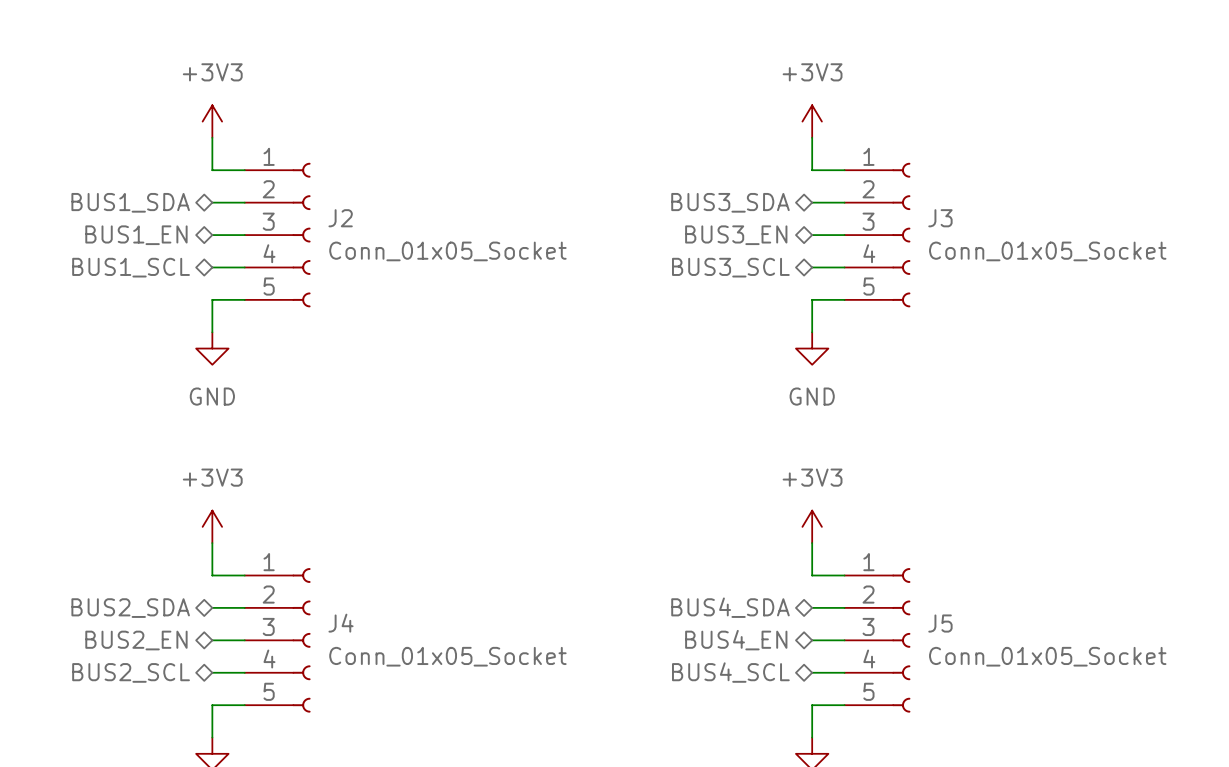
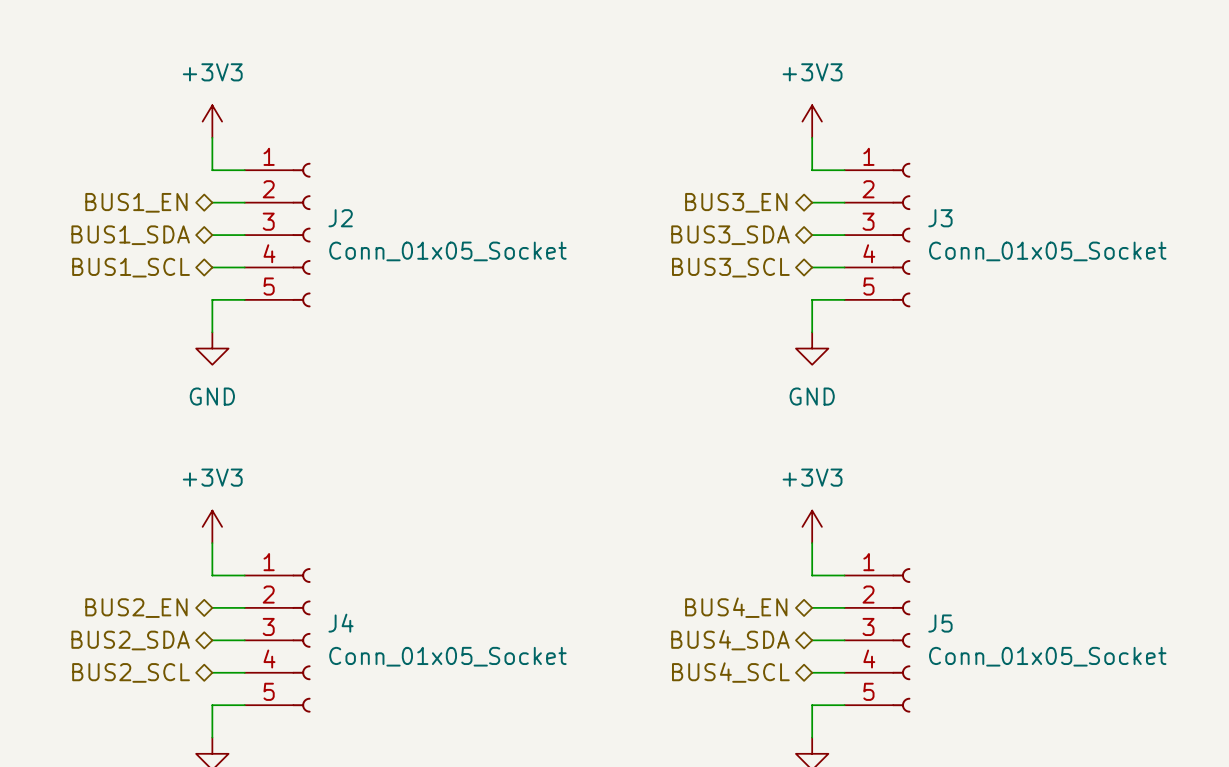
hierarchical label: BUS1_SDA (130, 202) -> BUS1_EN (136, 202)
hierarchical label: BUS3_SDA (730, 202) -> BUS3_EN (736, 202)
hierarchical label: BUS1_EN (136, 235) -> BUS1_SDA (130, 235)
hierarchical label: BUS3_EN (736, 235) -> BUS3_SDA (730, 235)
hierarchical label: BUS4_SDA (730, 607) -> BUS4_EN (736, 607)
hierarchical label: BUS2_SDA (130, 608) -> BUS2_EN (136, 608)
hierarchical label: BUS2_EN (136, 640) -> BUS2_SDA (130, 640)
hierarchical label: BUS4_EN (736, 640) -> BUS4_SDA (730, 640)

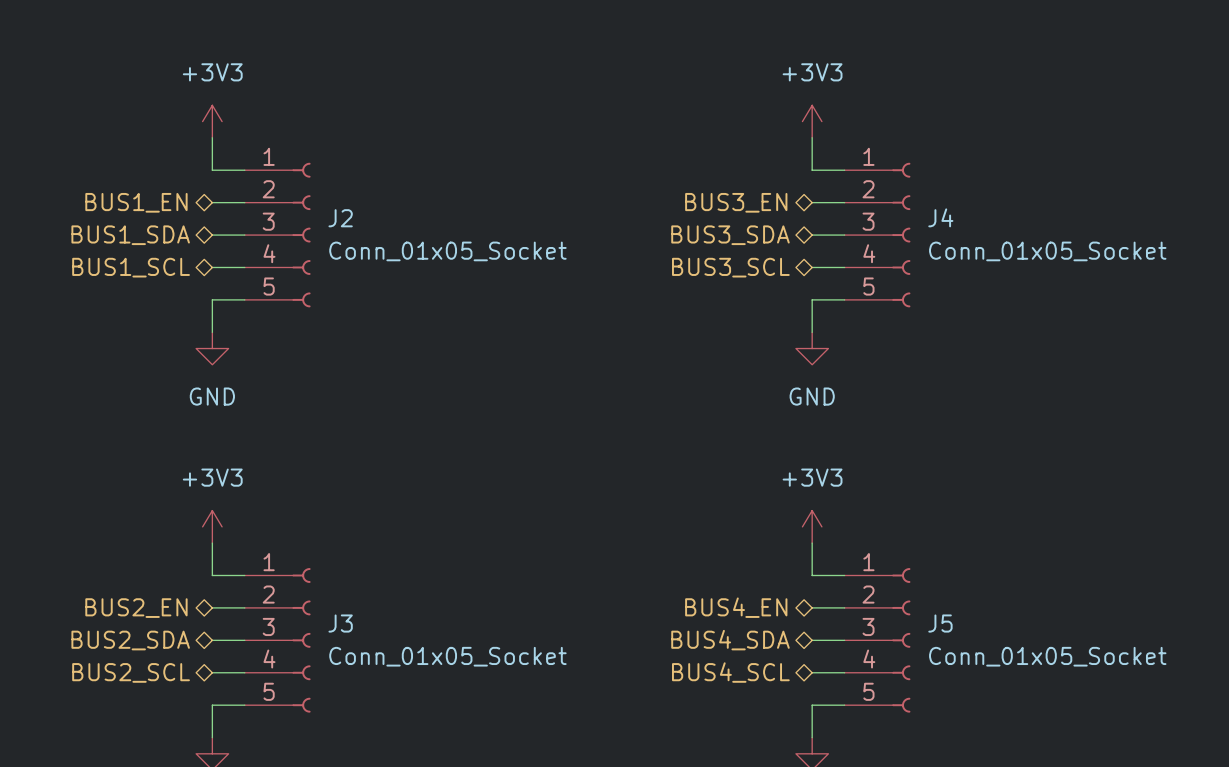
J3 name: J3 (940, 218) -> J4 (940, 217)
J4 name: J4 (341, 623) -> J3 (340, 623)

